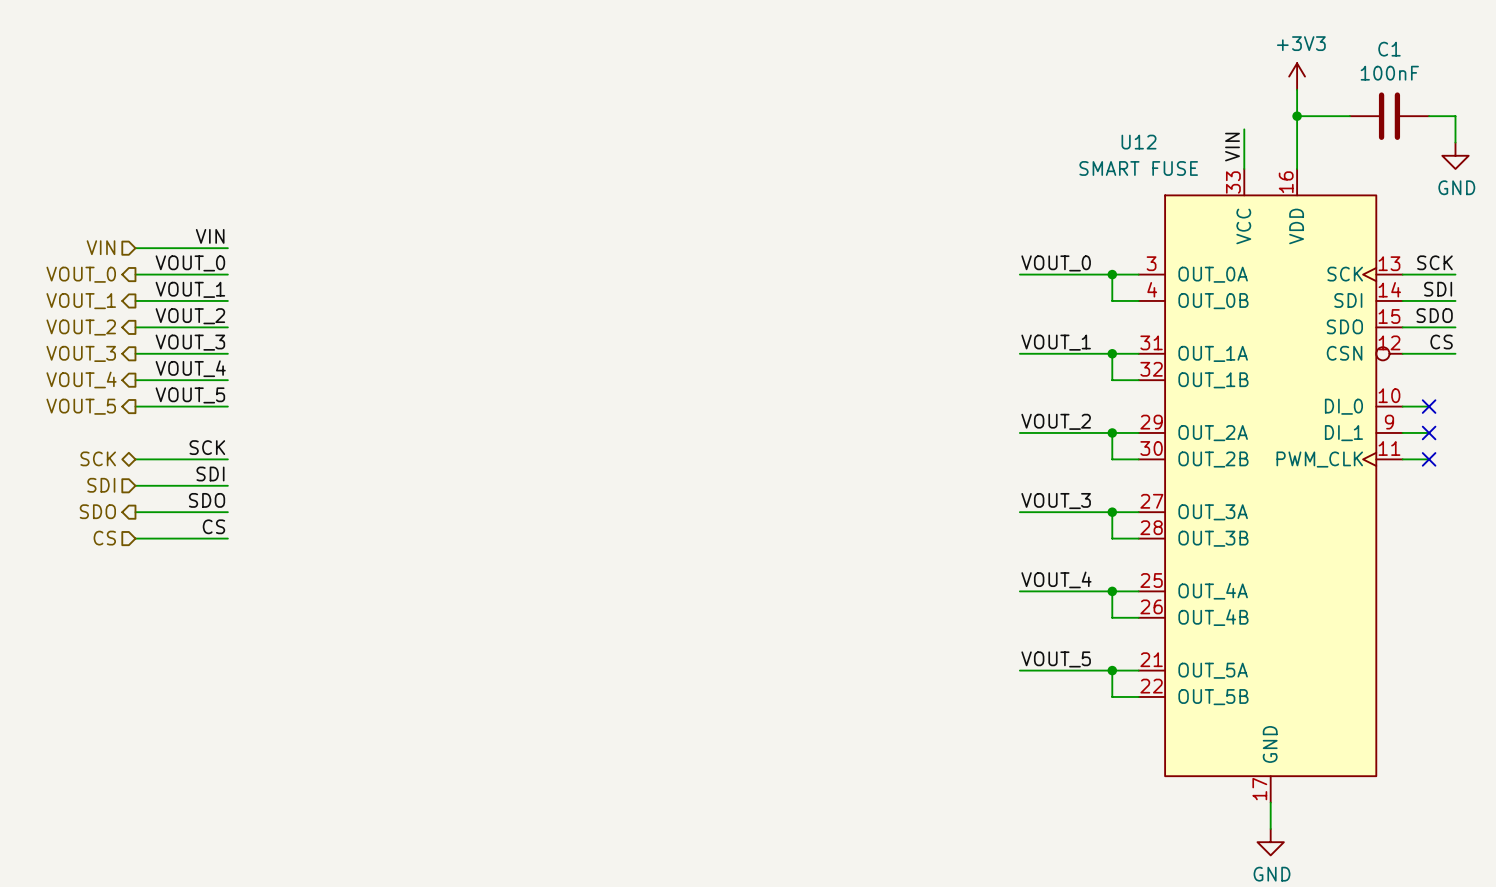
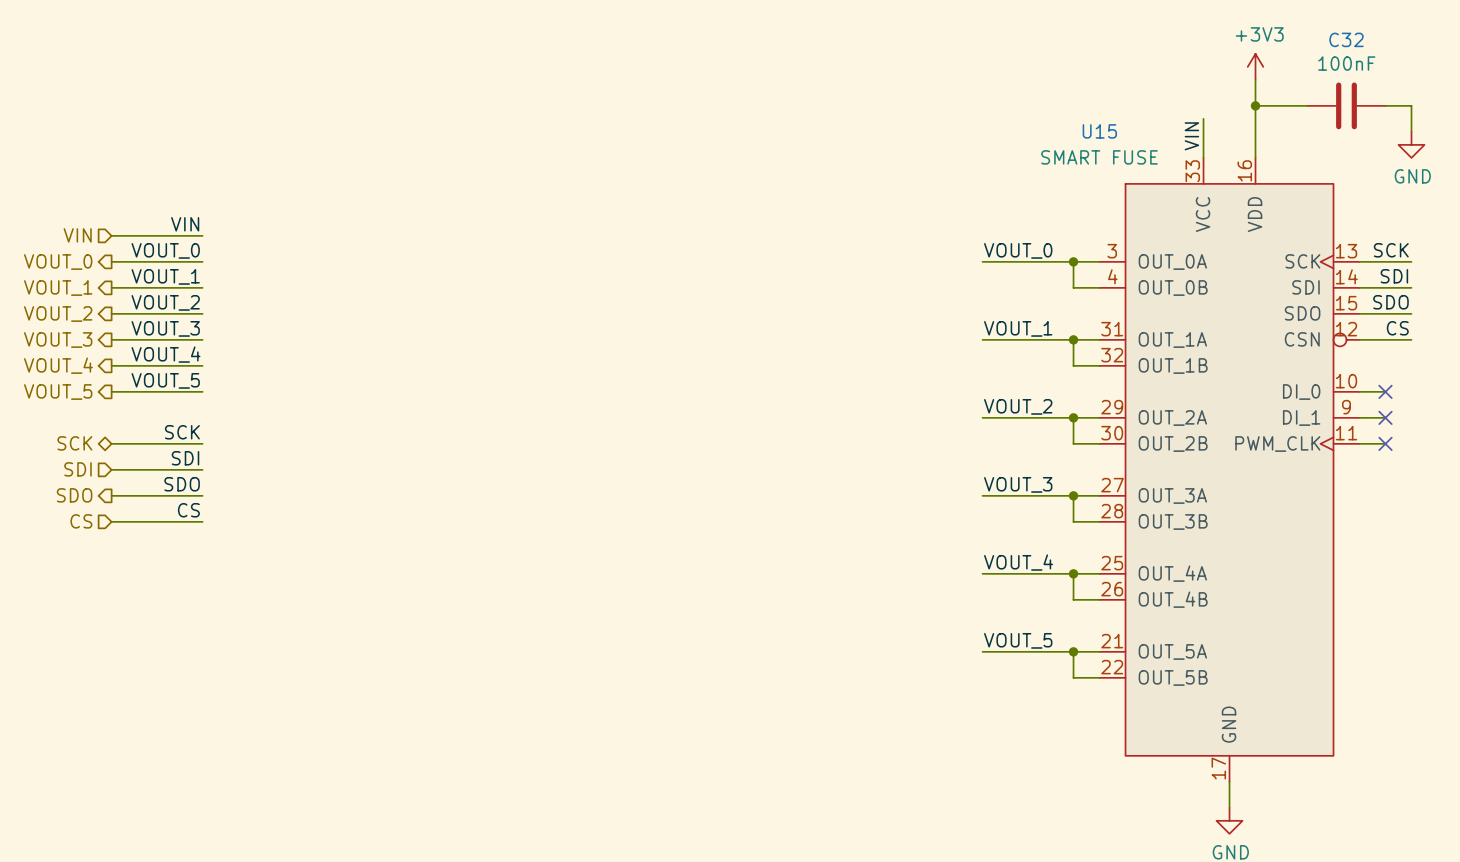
C1 name: C1 (1389, 49) -> C32 (1346, 39)
U12 name: U12 (1139, 142) -> U15 (1099, 131)

